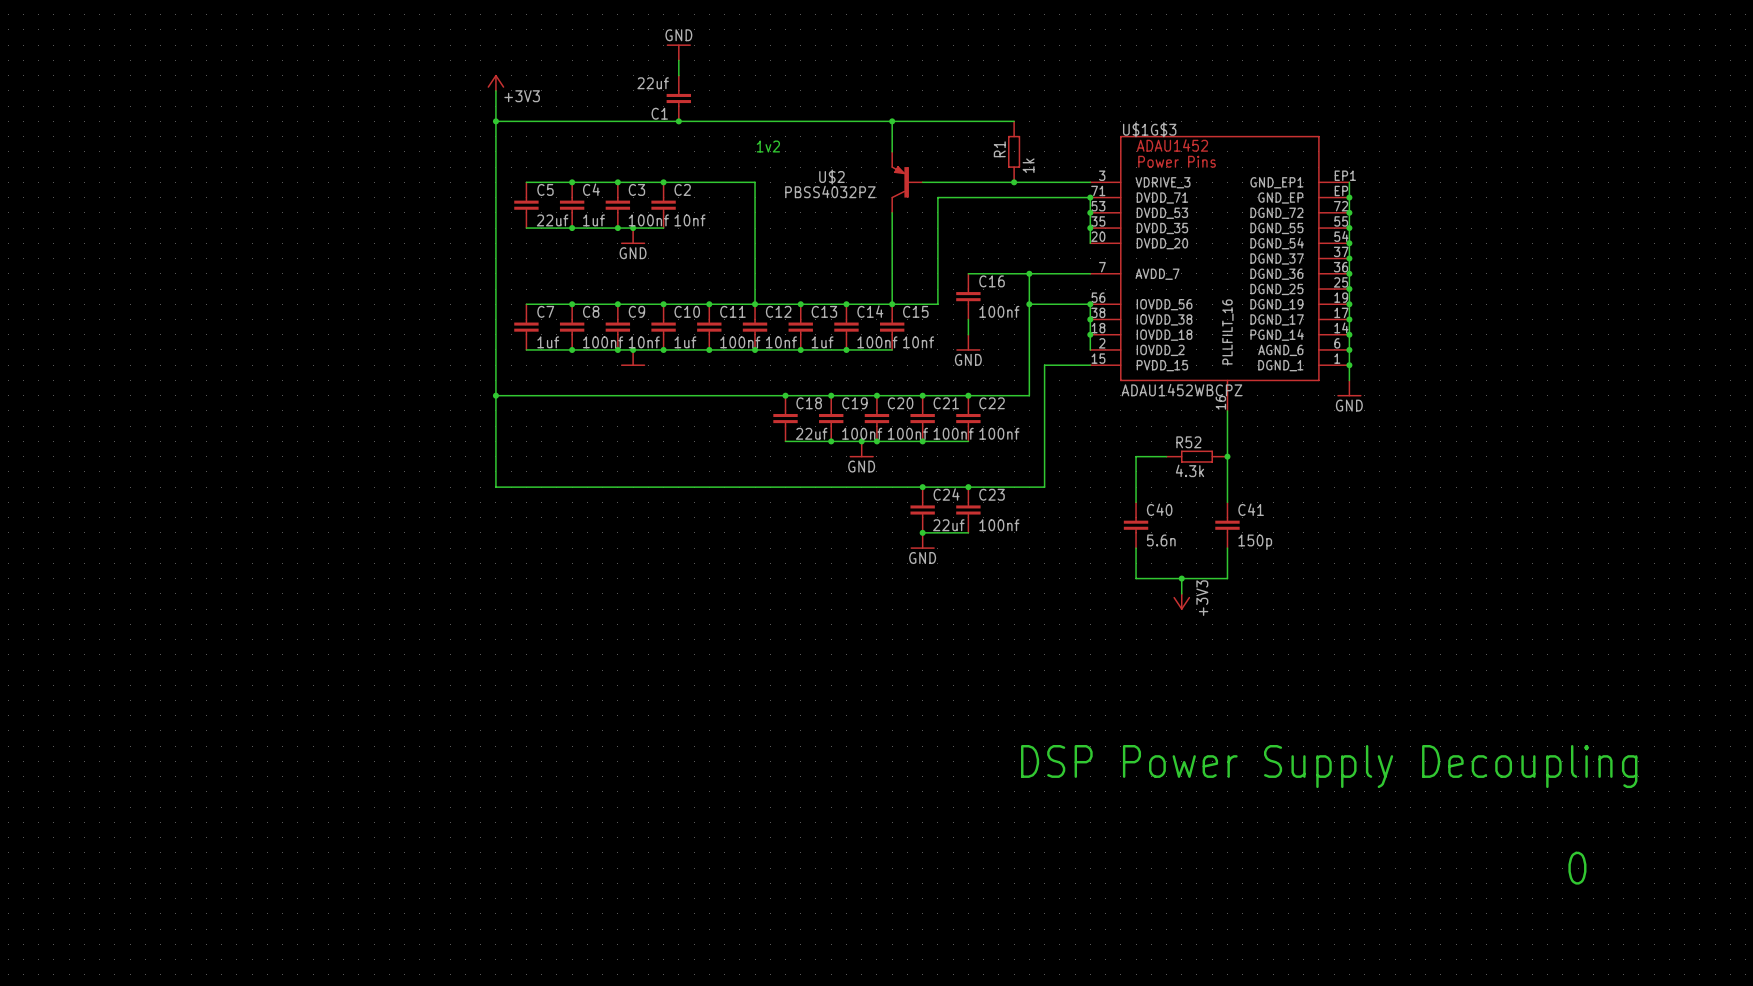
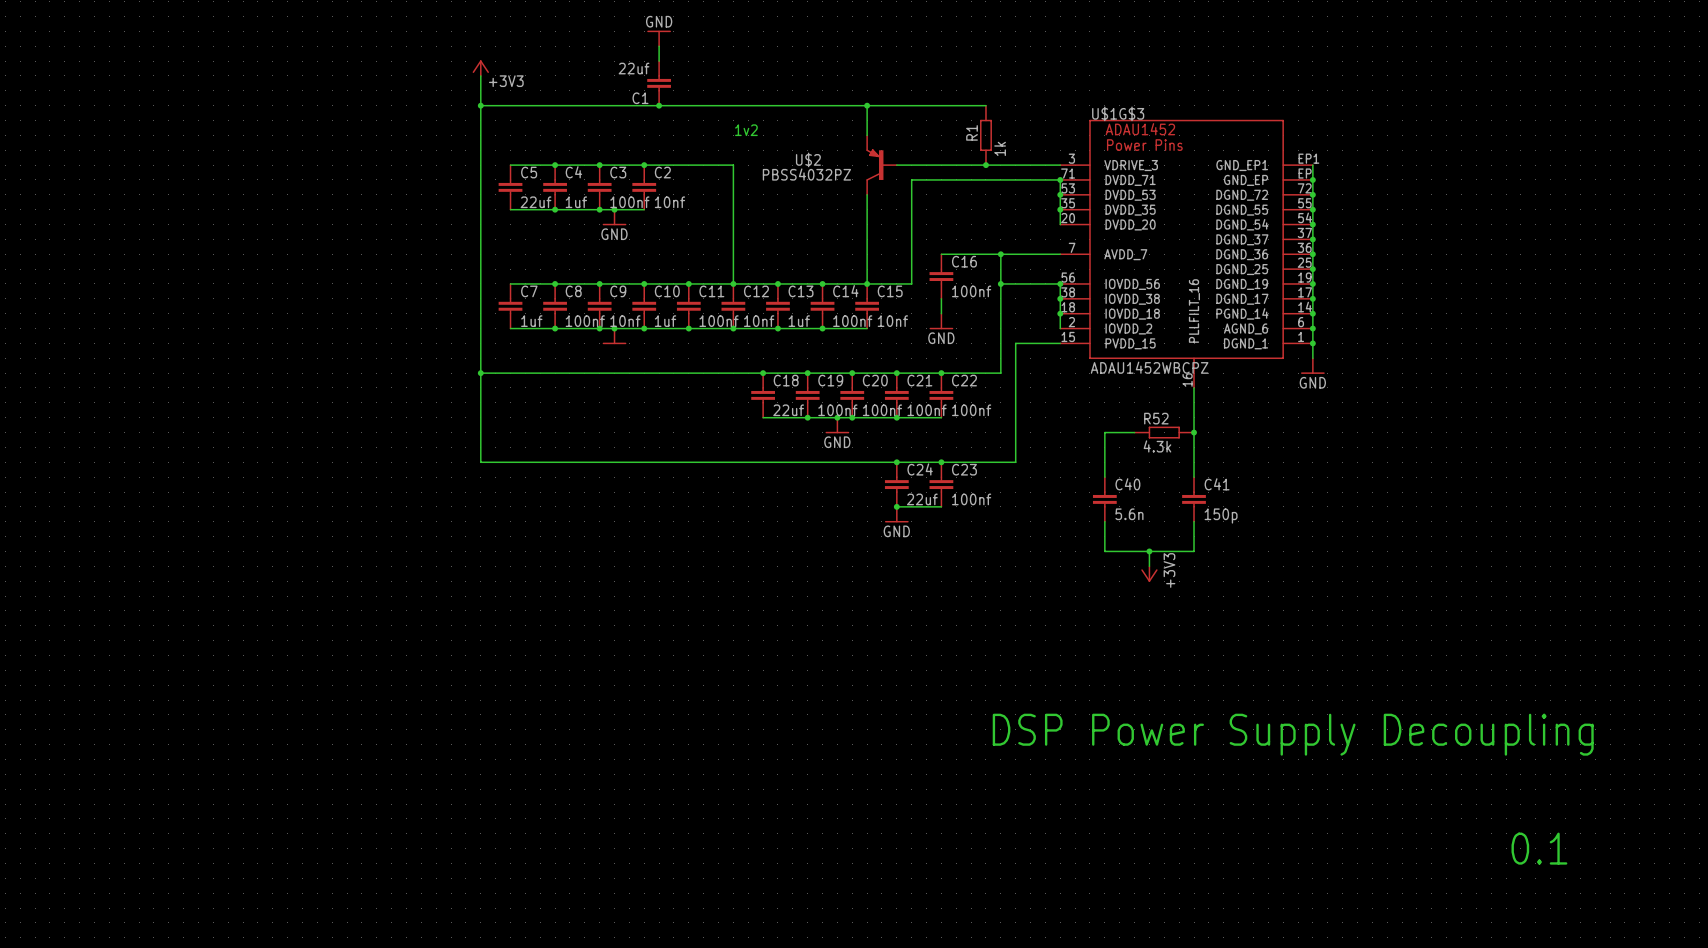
text: 0 (1577, 868) -> none
text: none -> 0.1 (1539, 848)

